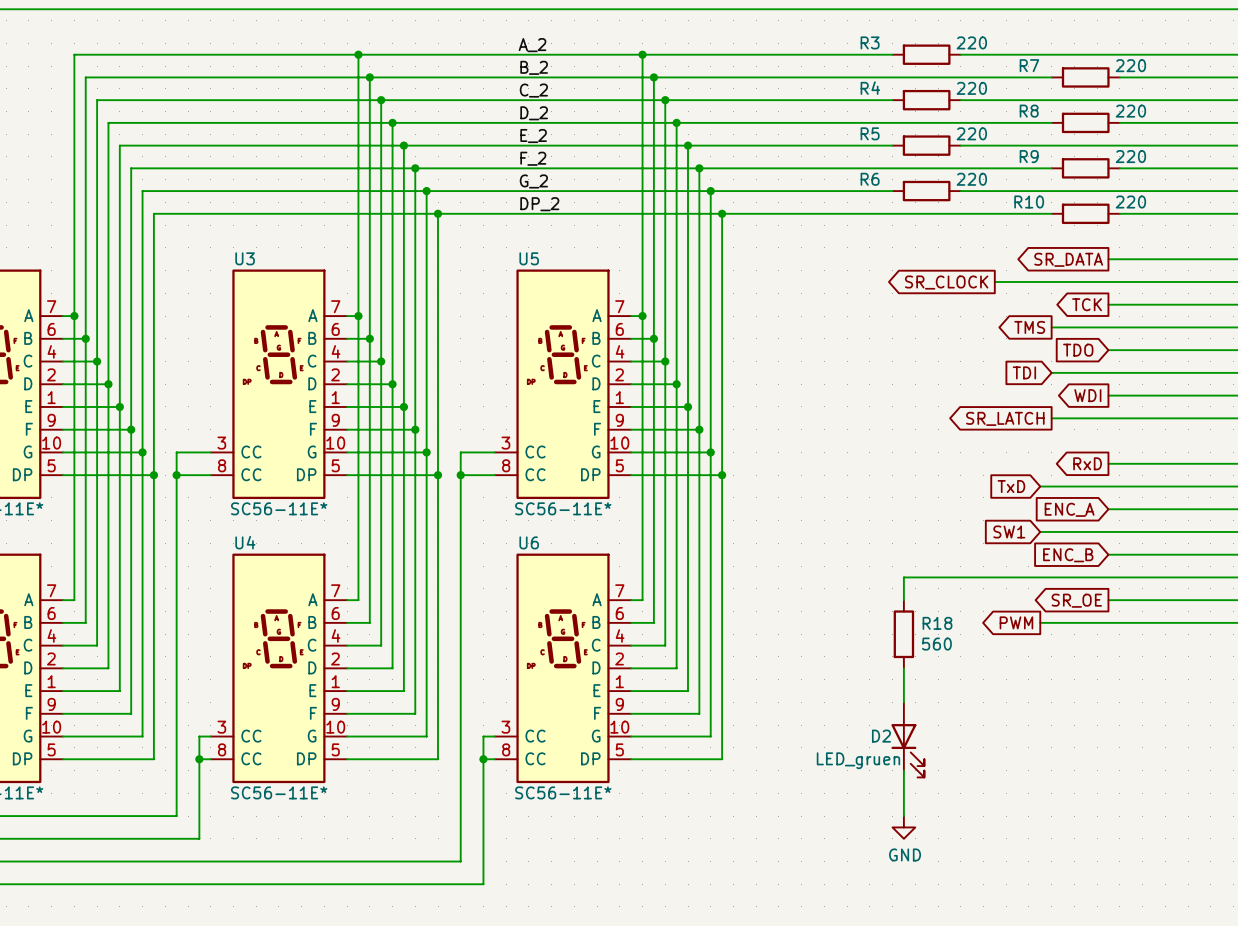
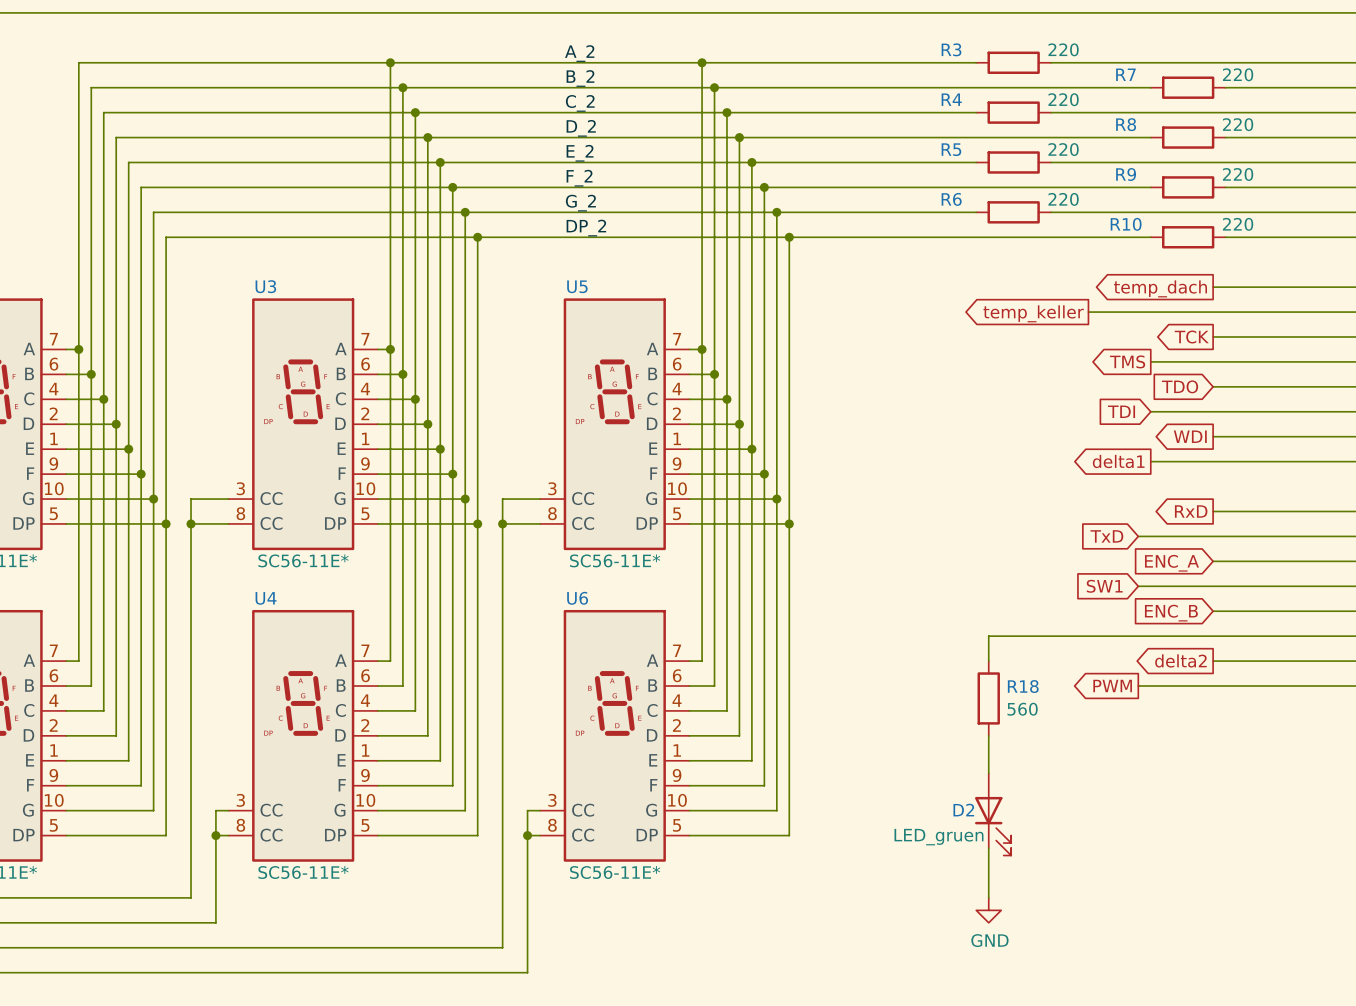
global label: SR_DATA (1068, 259) -> temp_dach (1160, 288)
global label: SR_CLOCK (946, 282) -> temp_keller (1033, 313)
global label: SR_LATCH (1005, 418) -> delta1 (1118, 461)
global label: SR_OE (1076, 600) -> delta2 (1180, 660)

